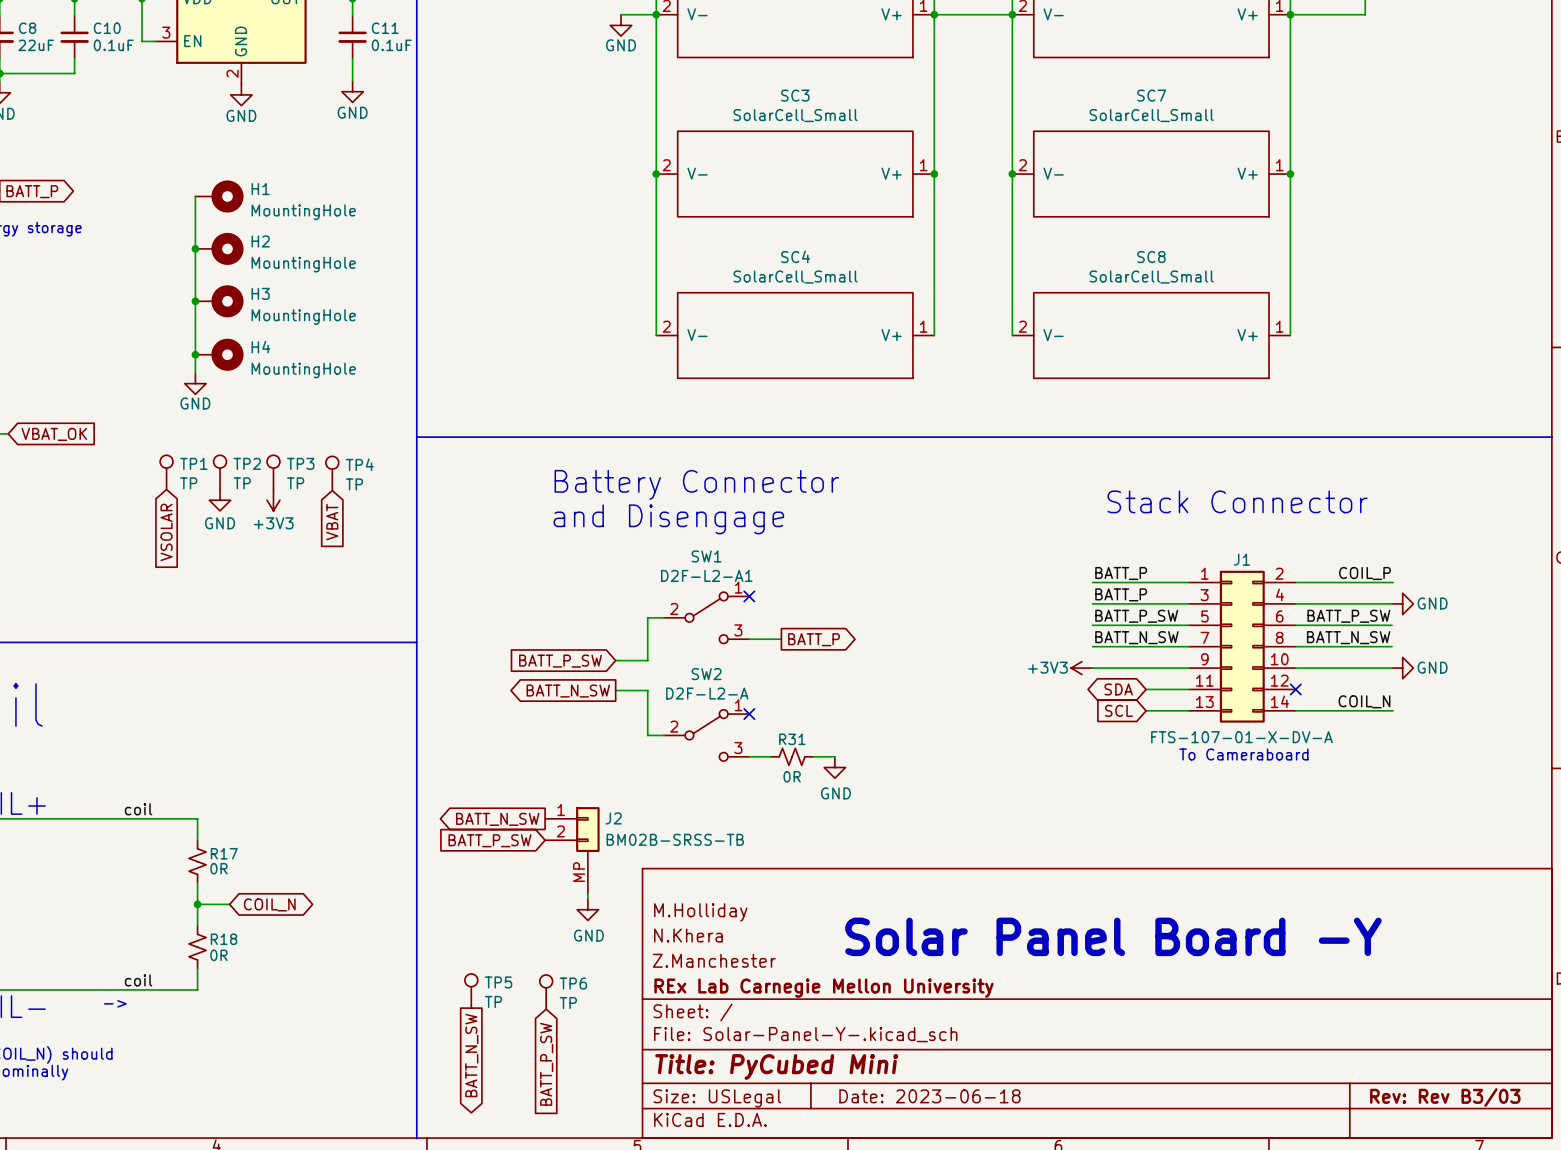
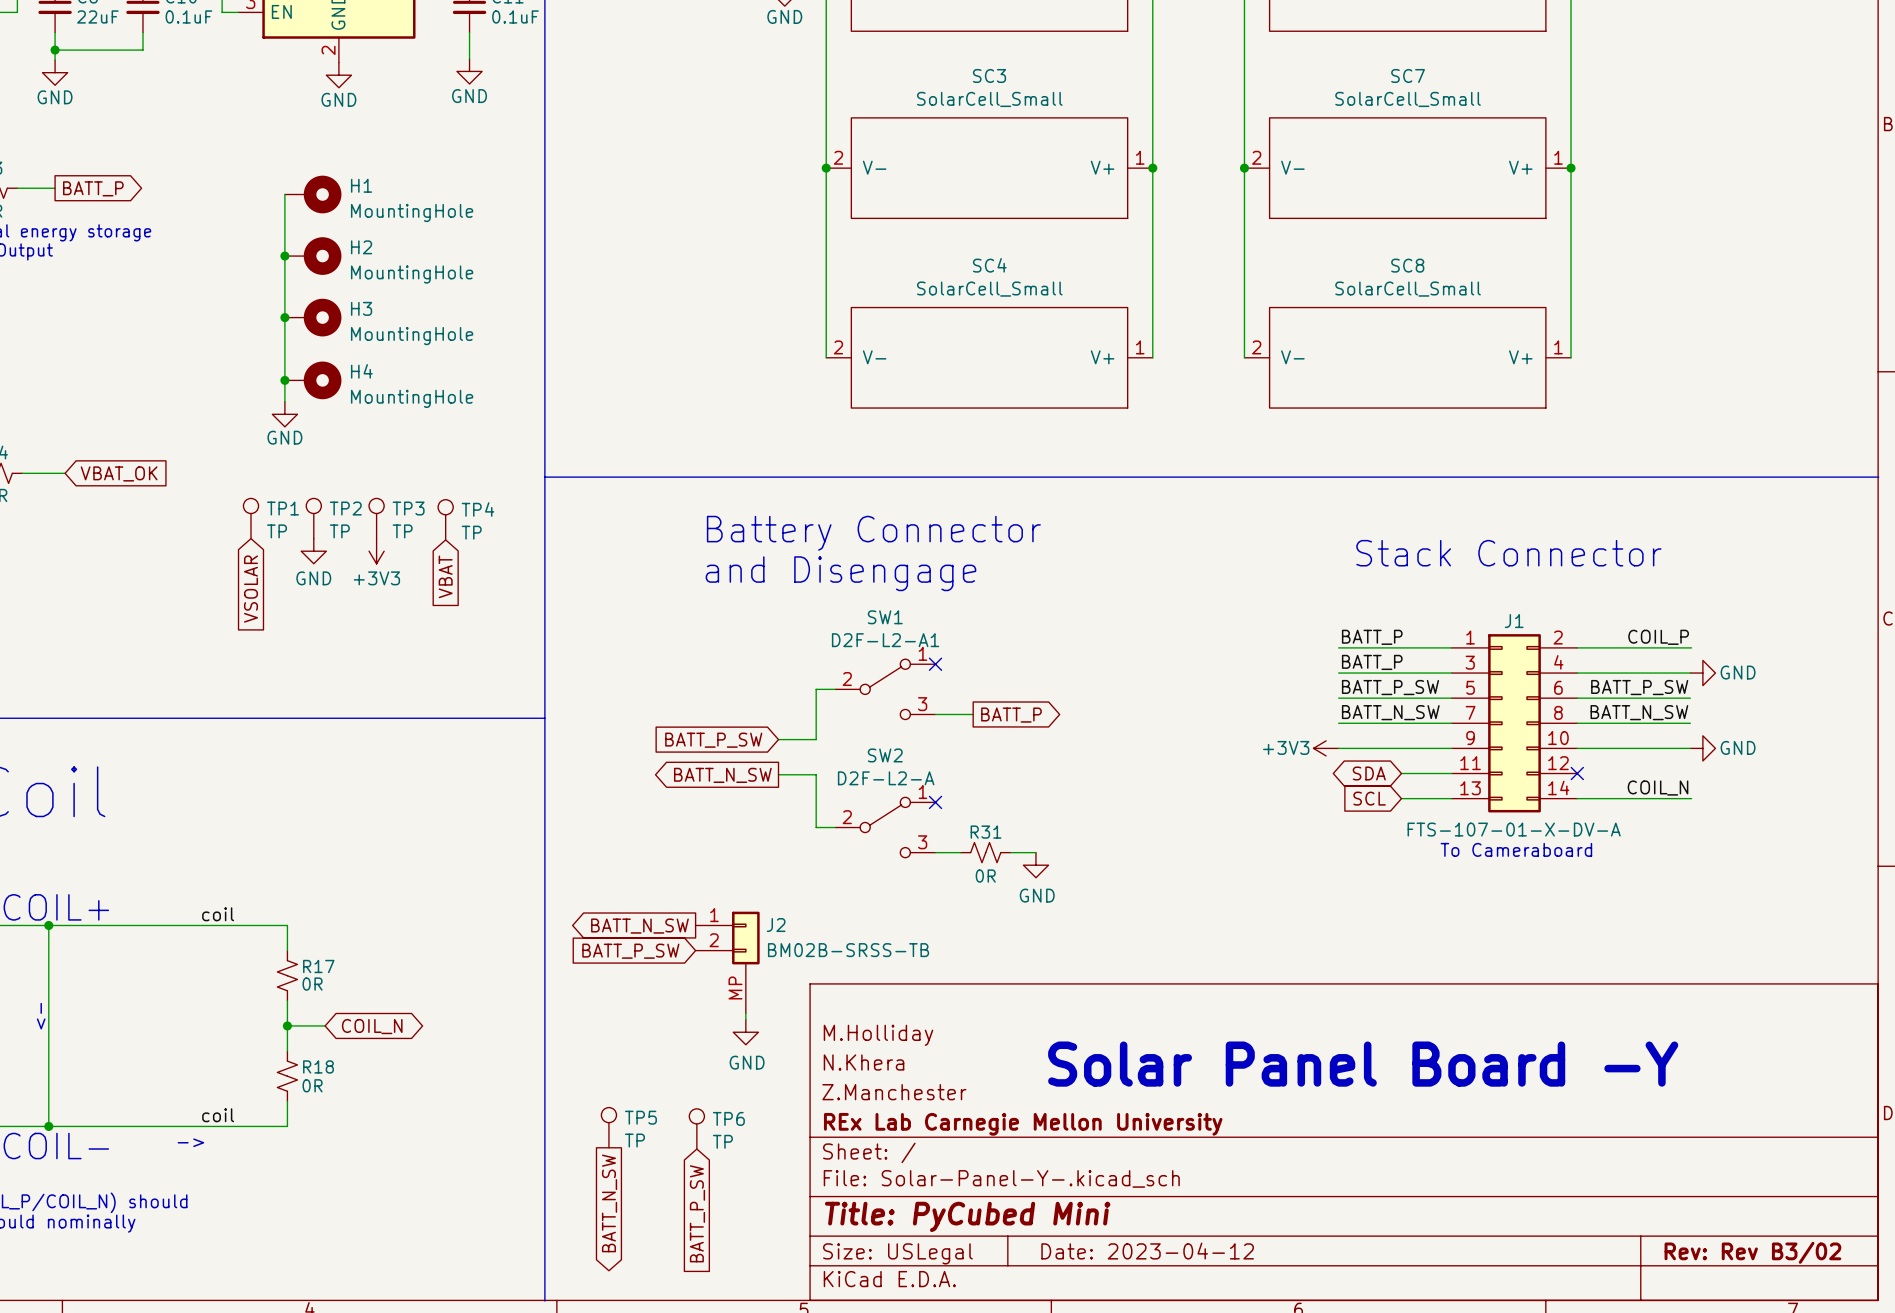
title block: Date: 2023-06-18 (929, 1096) -> Date: 2023-04-12 (1147, 1251)
title block: Rev: Rev B3/03 (1445, 1097) -> Rev: Rev B3/02 (1752, 1252)

